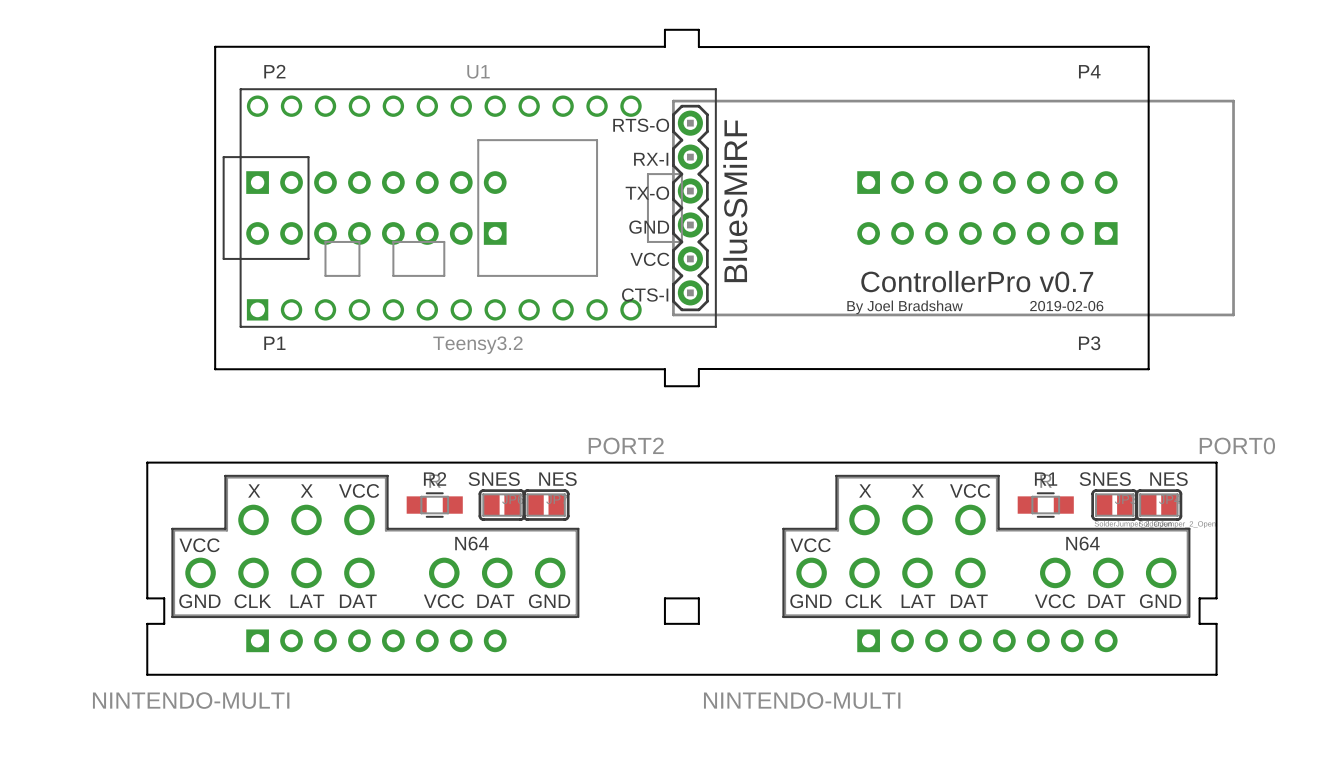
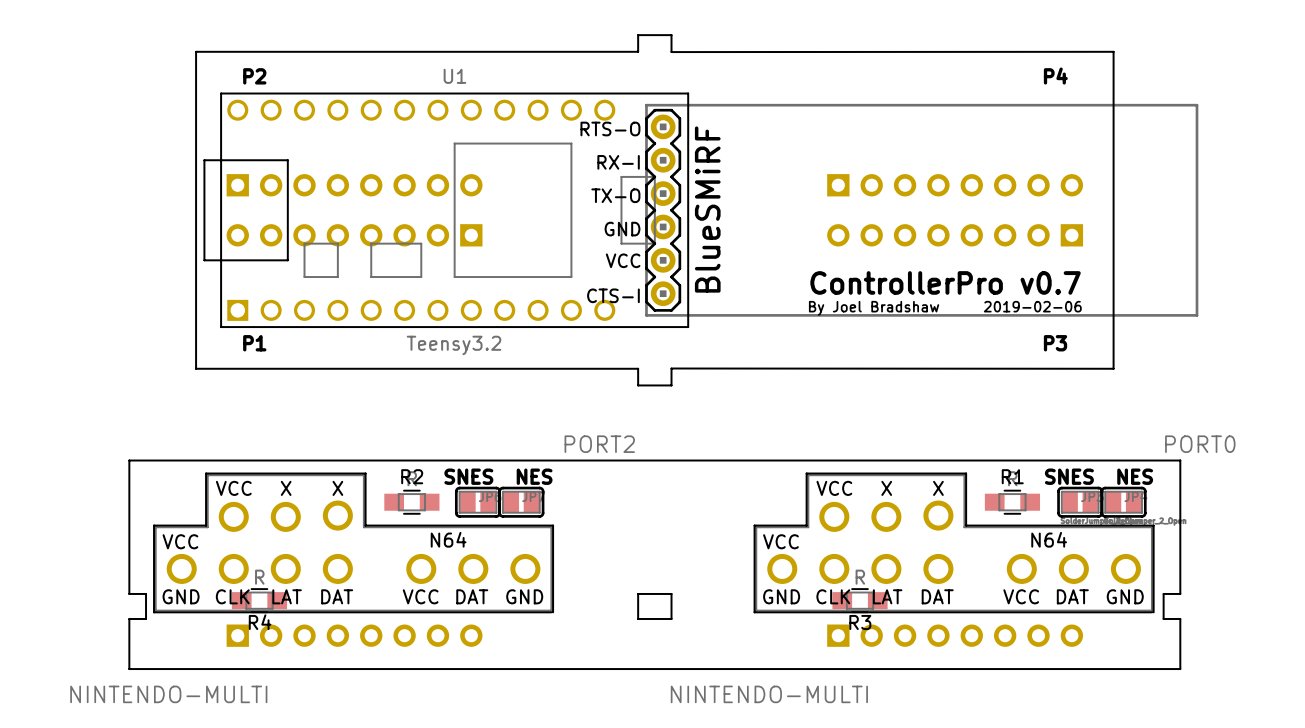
PORT2 footprint: [171, 474, 580, 619] -> [153, 472, 555, 614]
PORT0 footprint: [782, 474, 1191, 619] -> [753, 472, 1155, 614]
R4: none -> R (259, 600)
R3: none -> R (860, 600)

